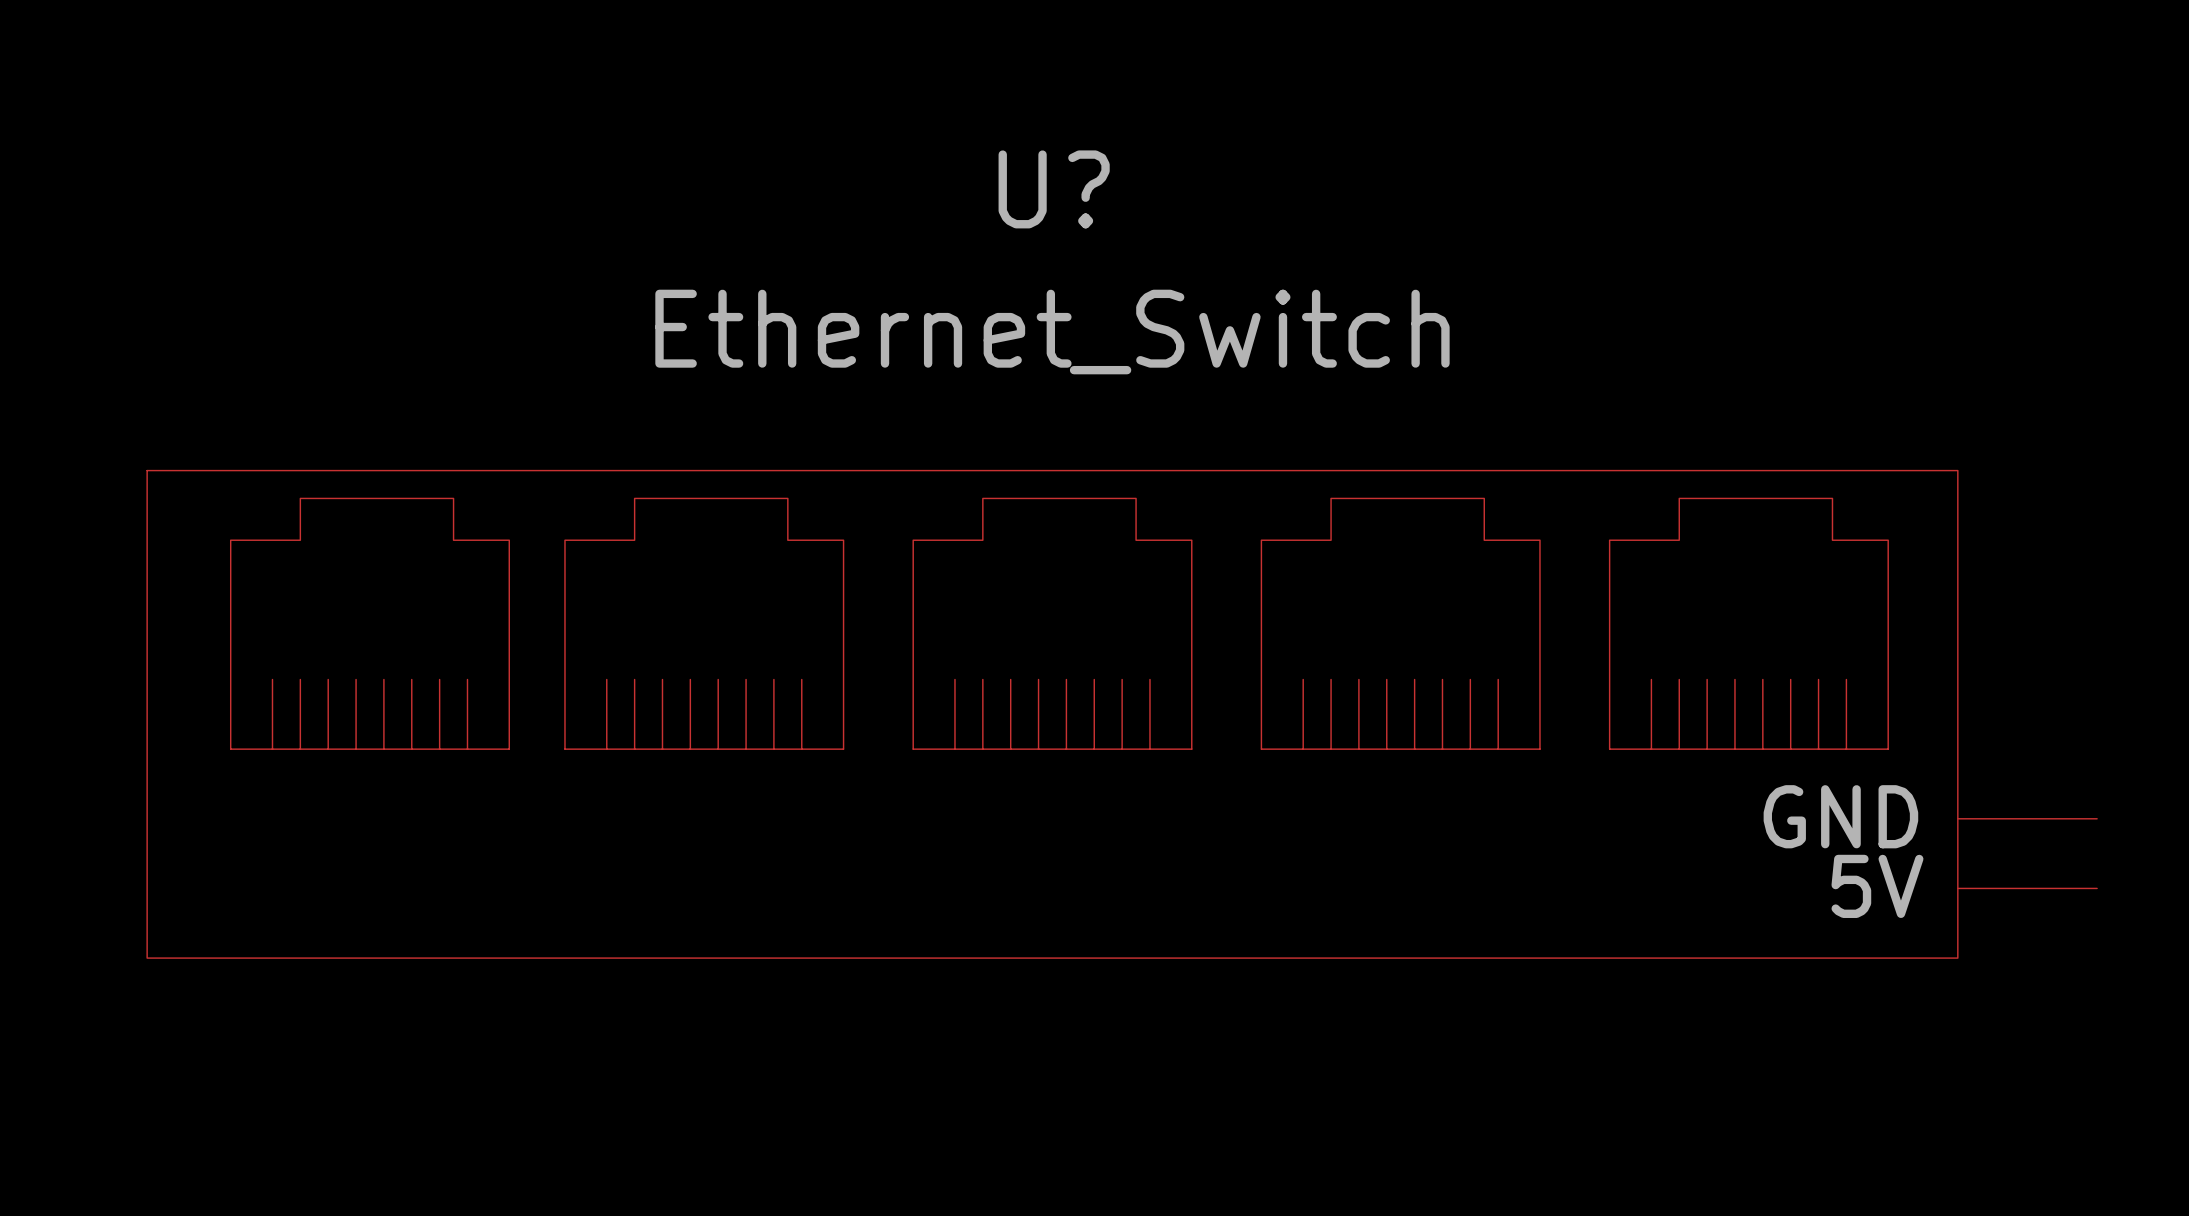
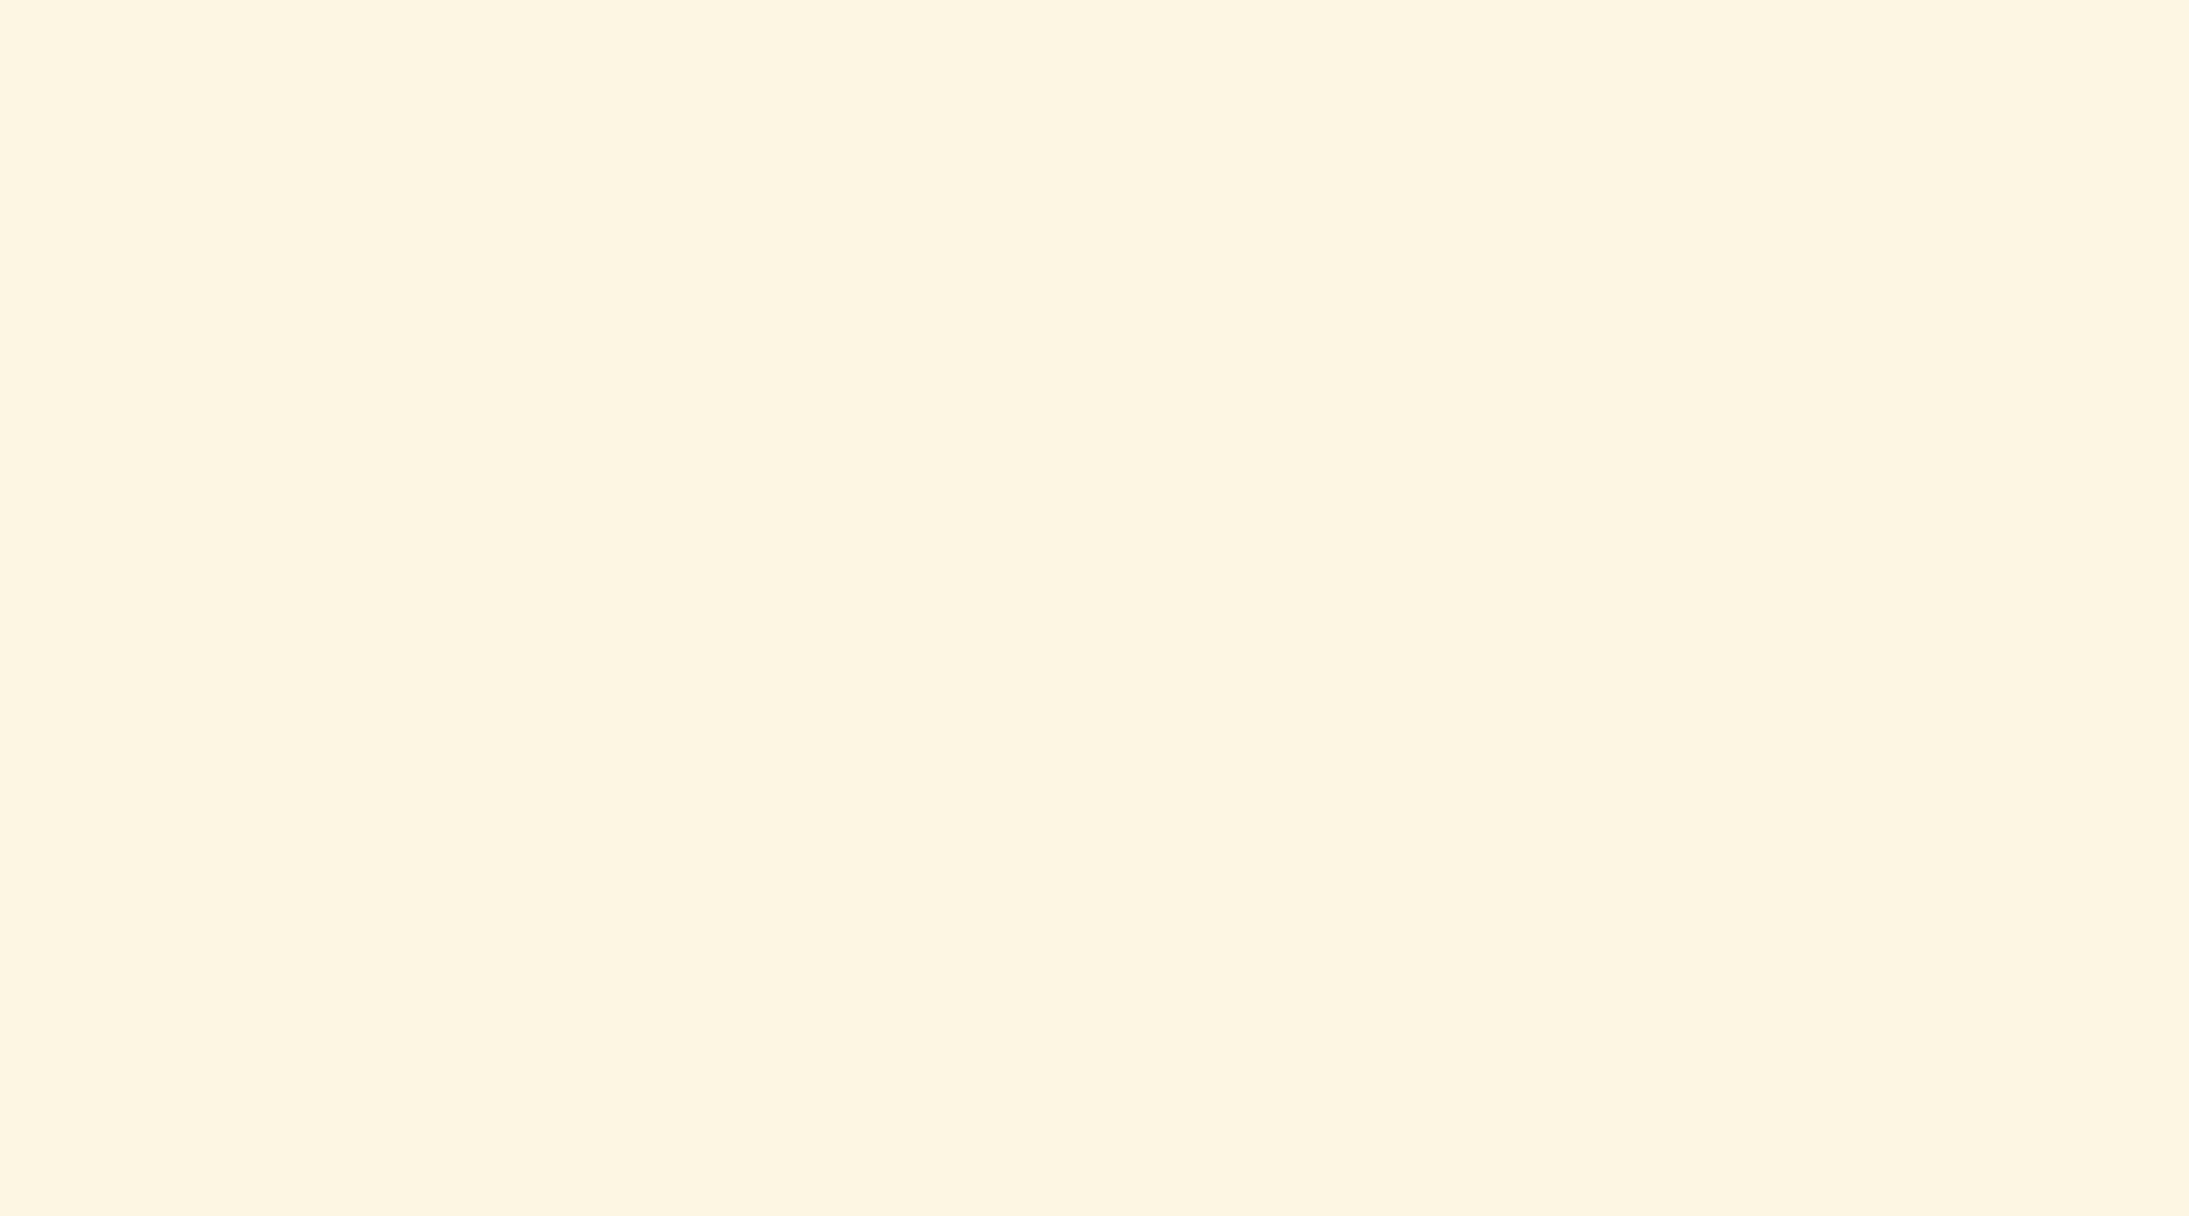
U?: Ethernet_Switch (1122, 714) -> none

